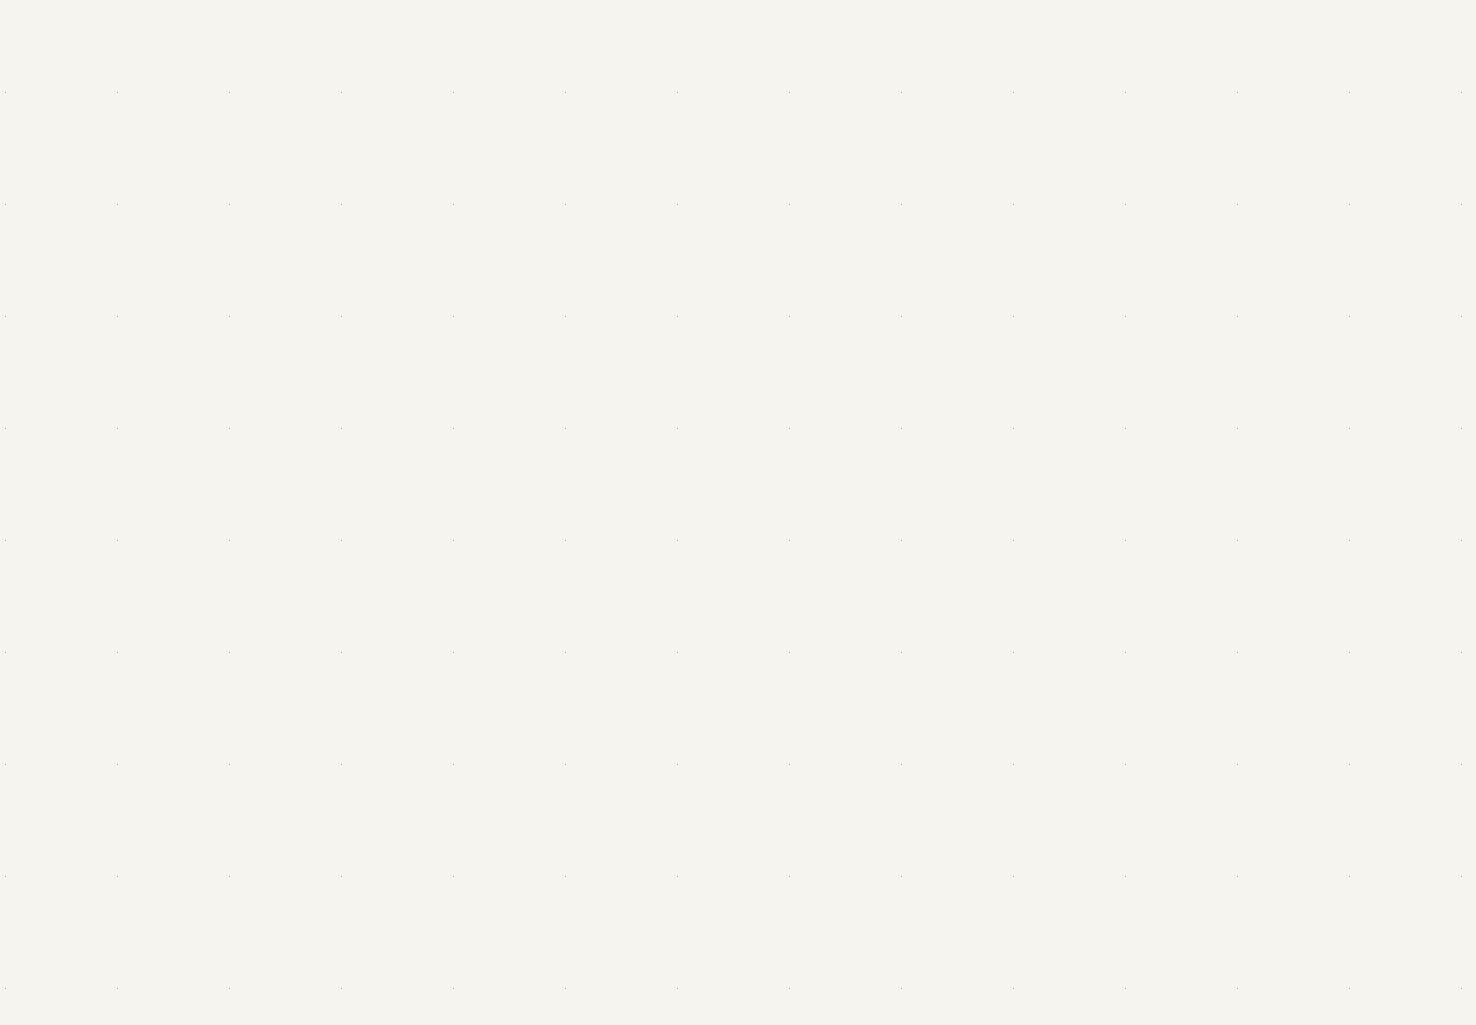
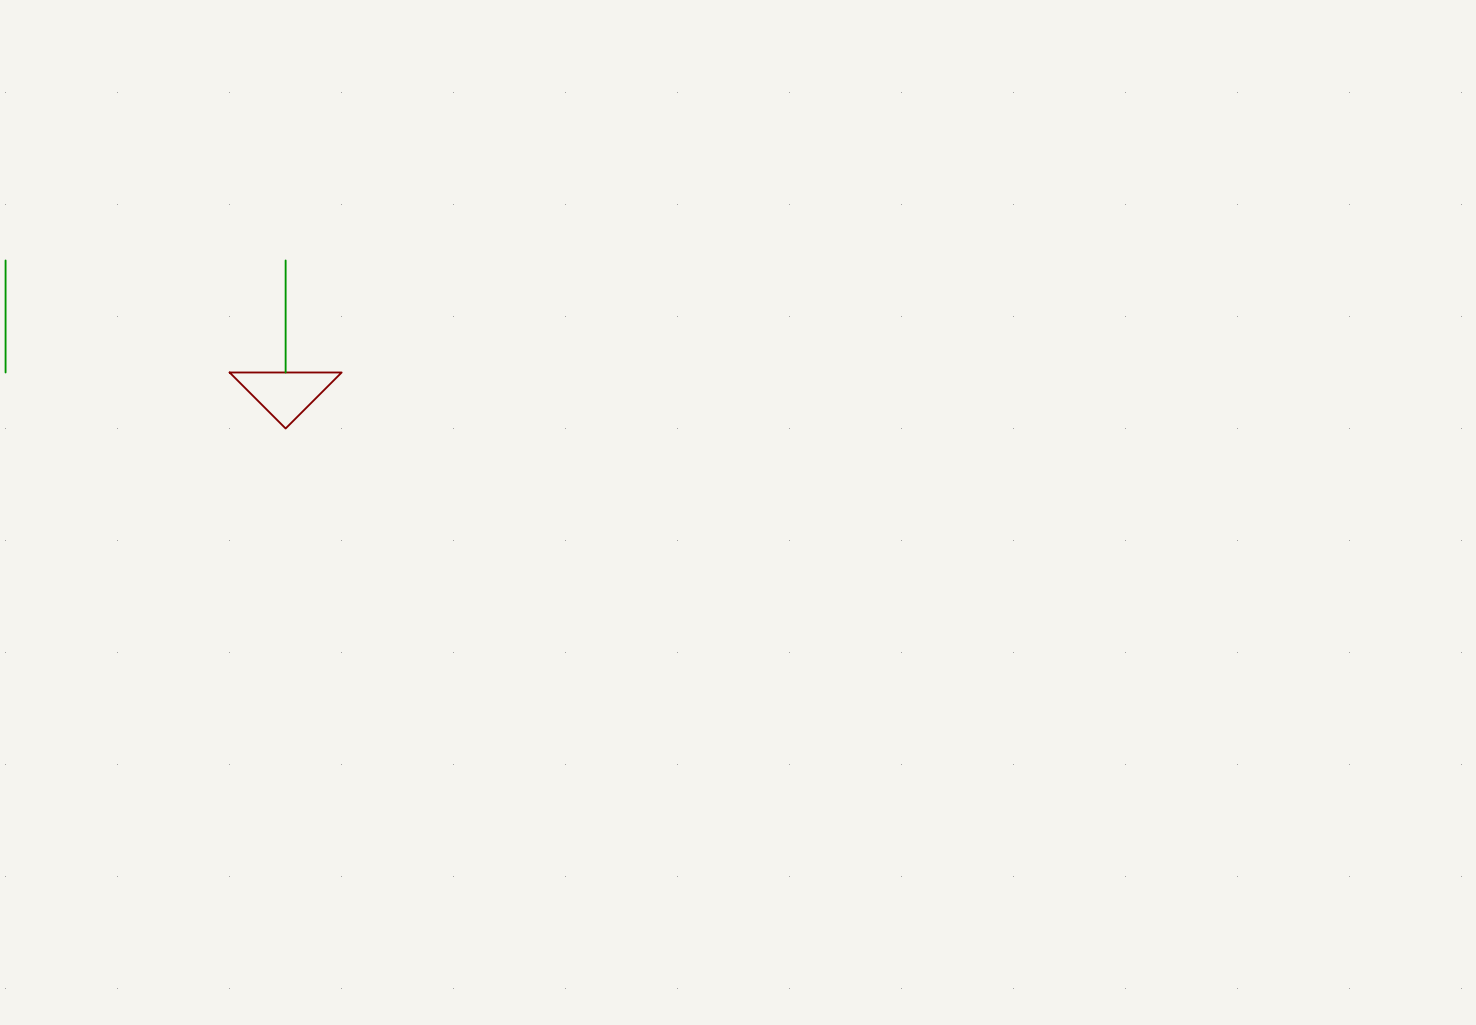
wire: none -> (5, 260) (5, 372)
wire: none -> (285, 260) (285, 372)
power symbol: none -> (285, 400)

